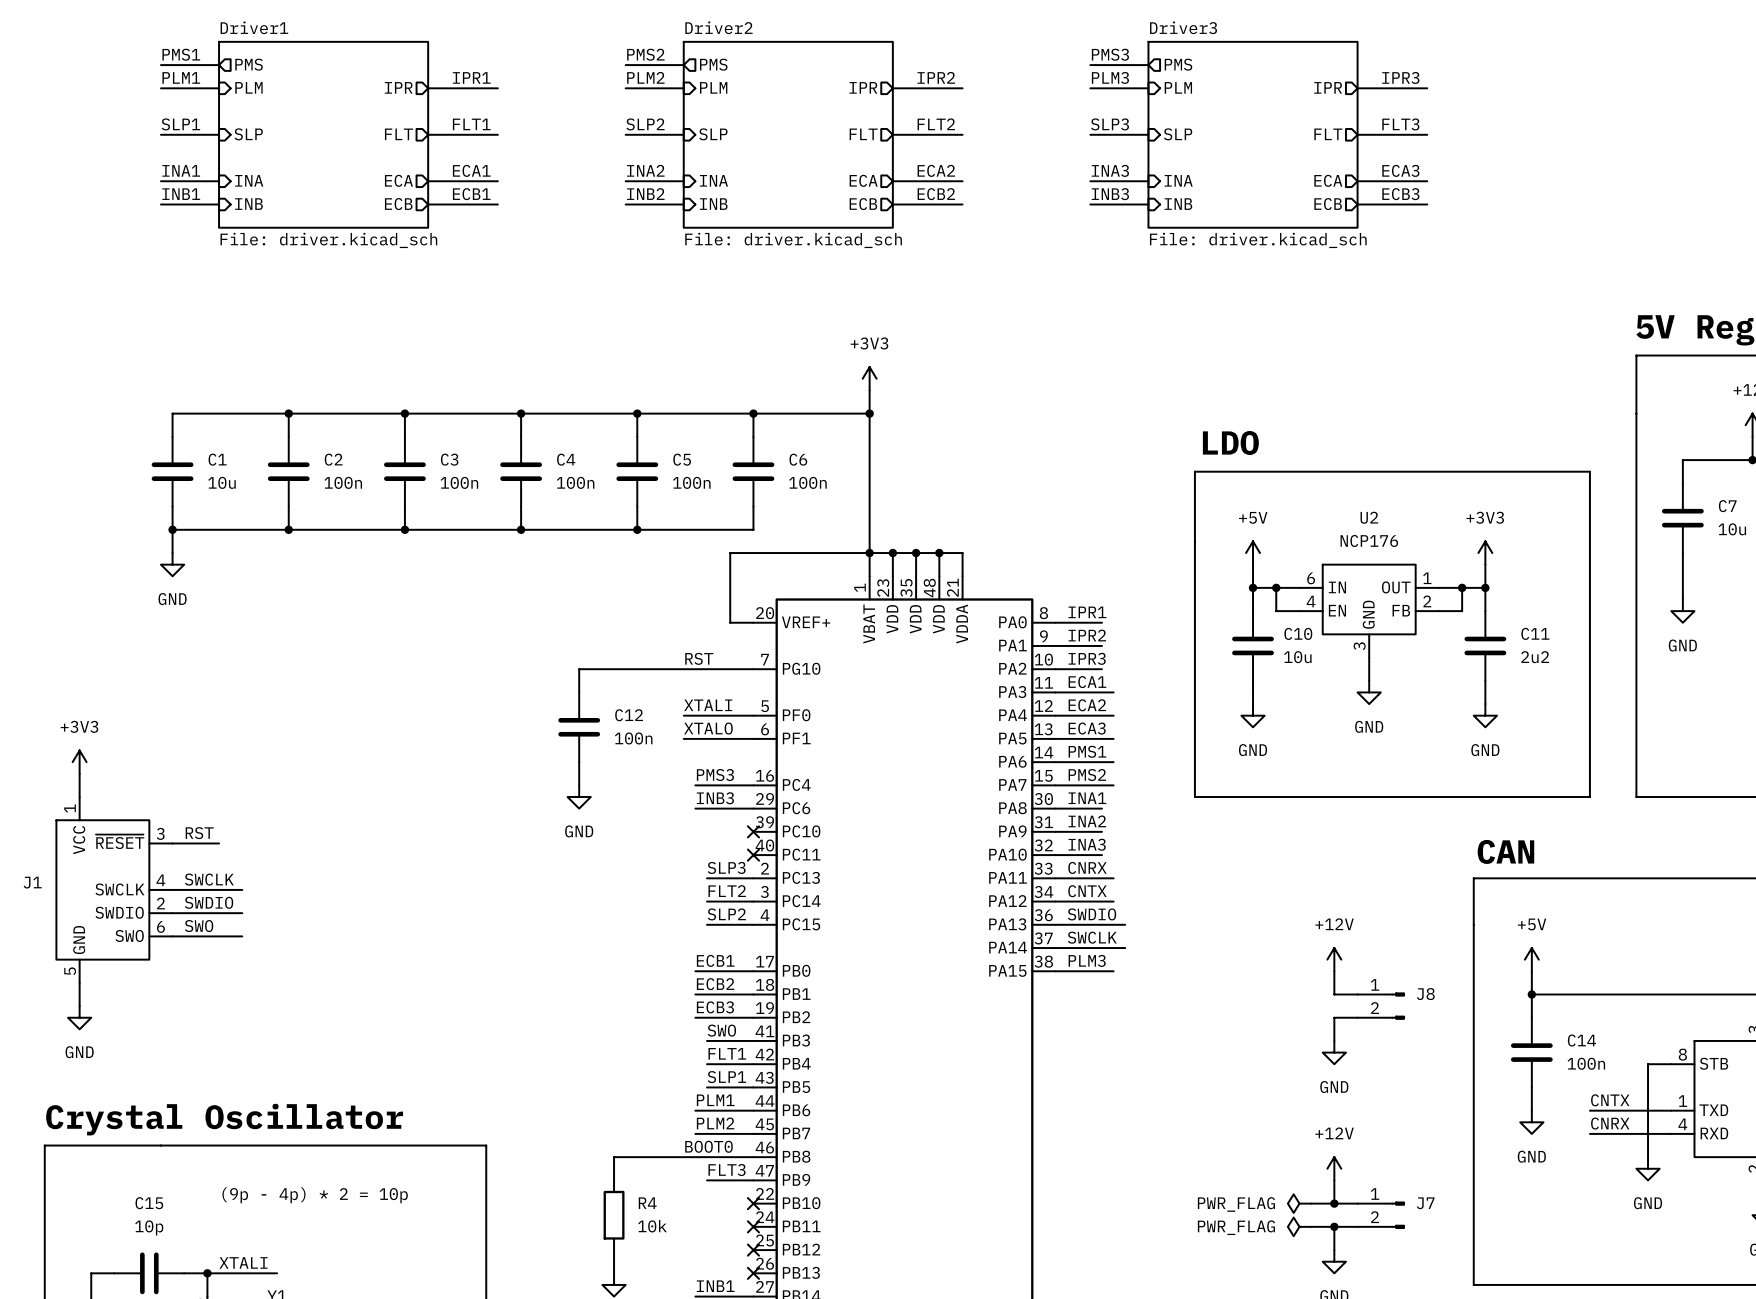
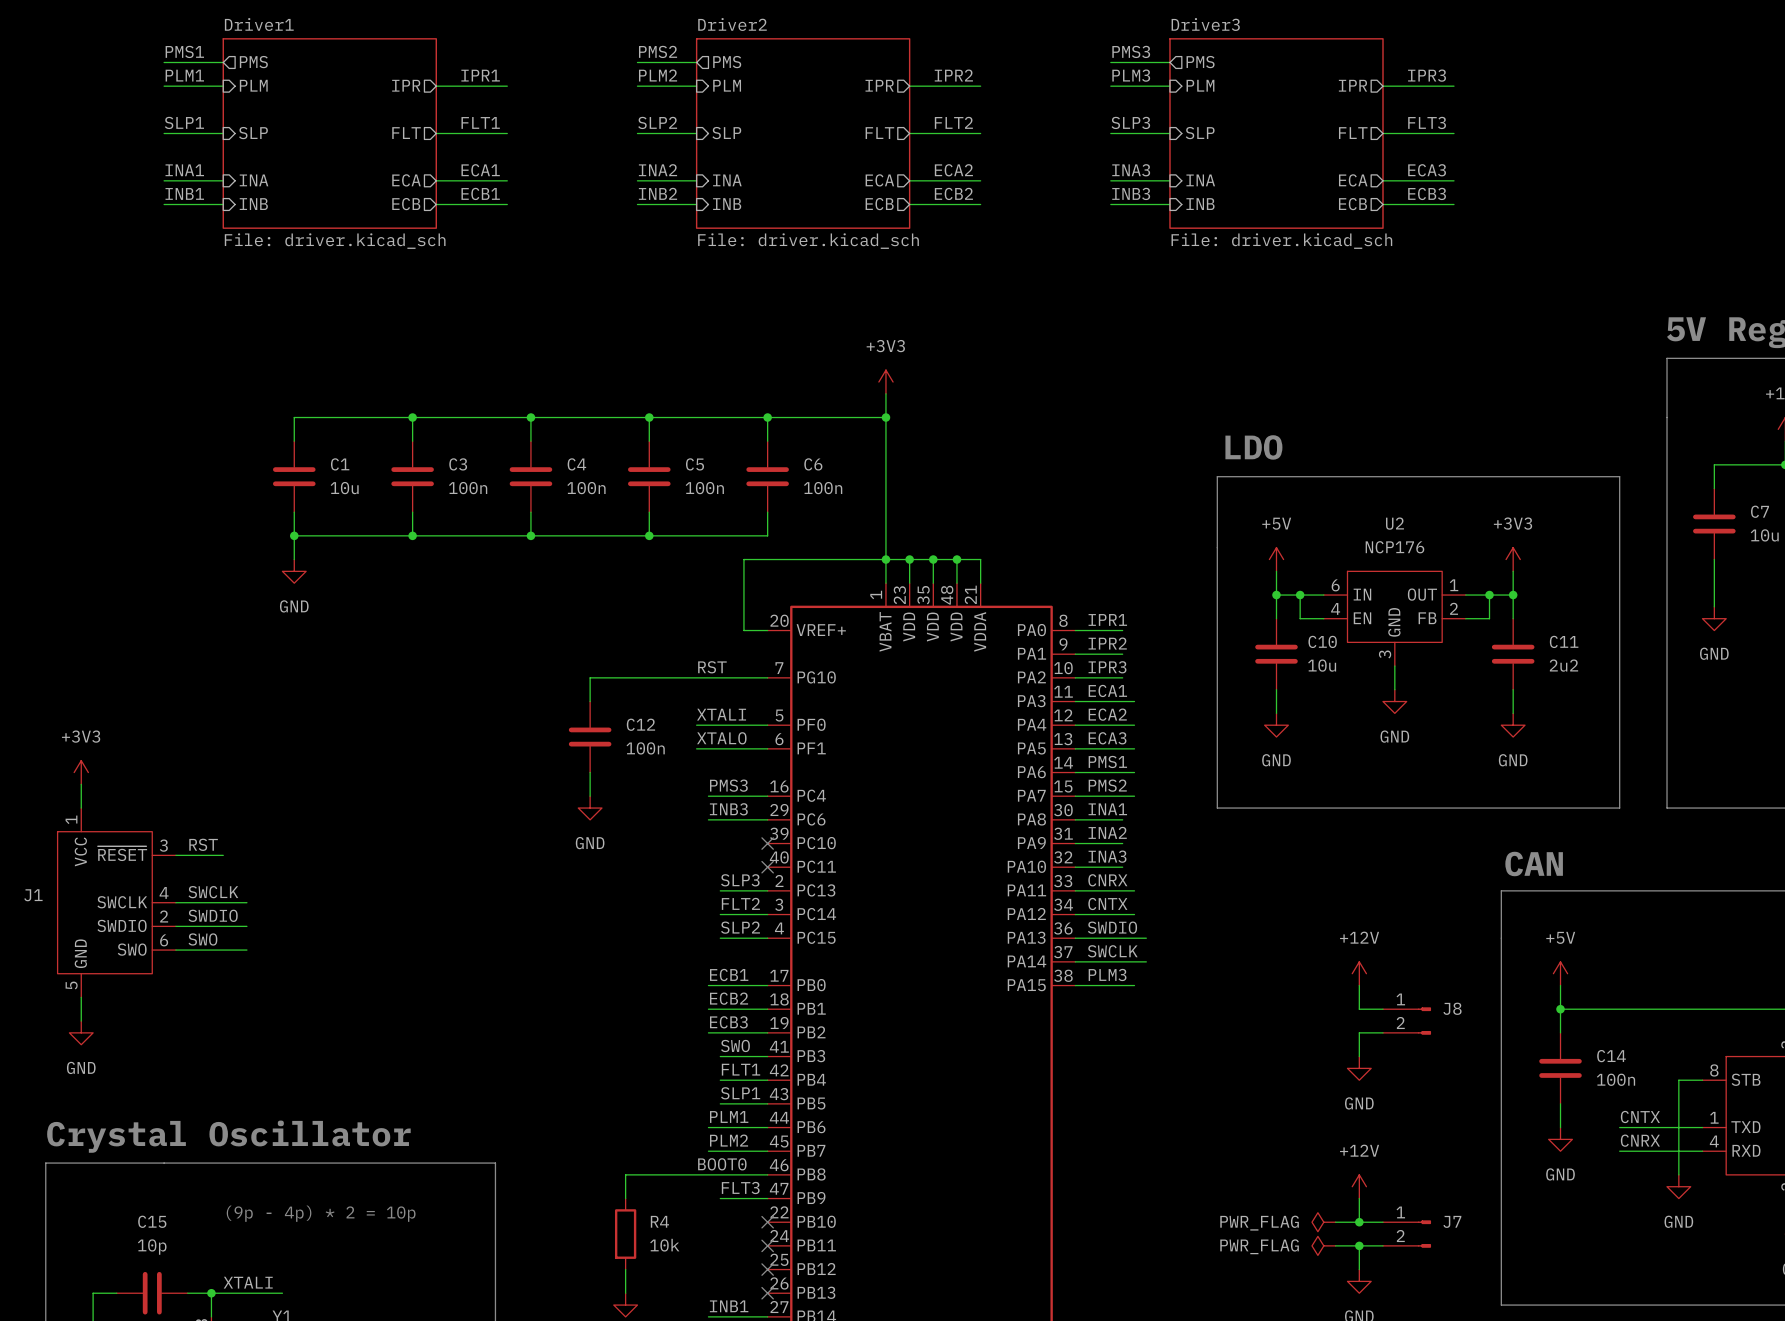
wire: (288, 413) (172, 413) (172, 436) -> none
junction: (288, 413) -> none
C2 name: C2 (333, 459) -> C1 (340, 464)
C1: 10u (172, 471) -> none
C2 value: 100n (343, 482) -> 10u (344, 488)
wire: (172, 506) (172, 553) -> none
wire: (172, 529) (288, 529) -> (294, 559) (294, 535)
junction: (172, 529) -> none
power symbol position: GND (172, 564) -> GND (294, 571)

